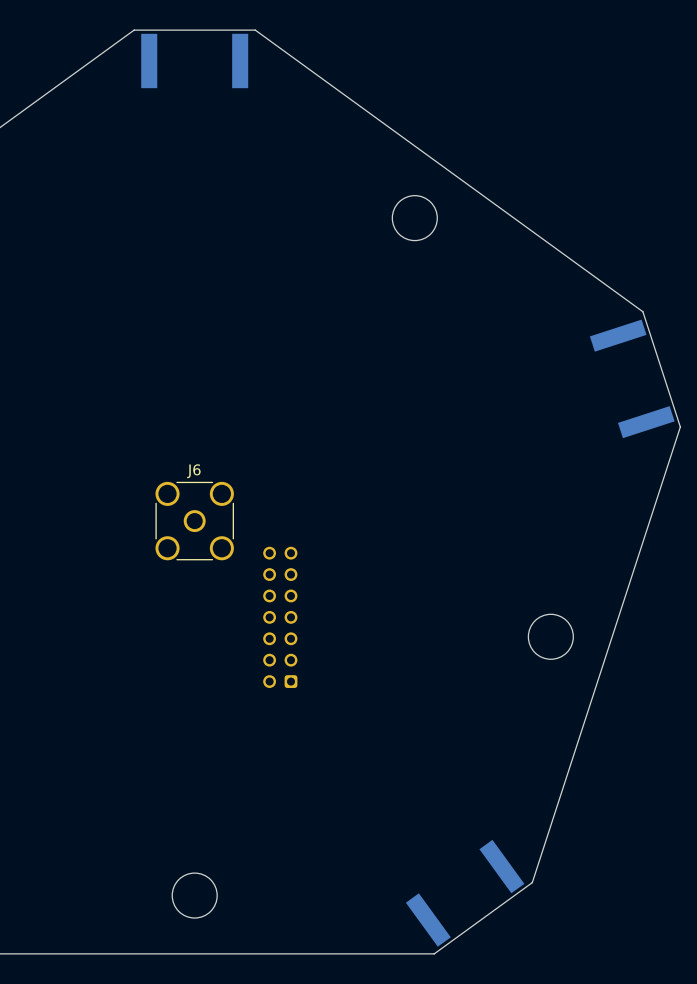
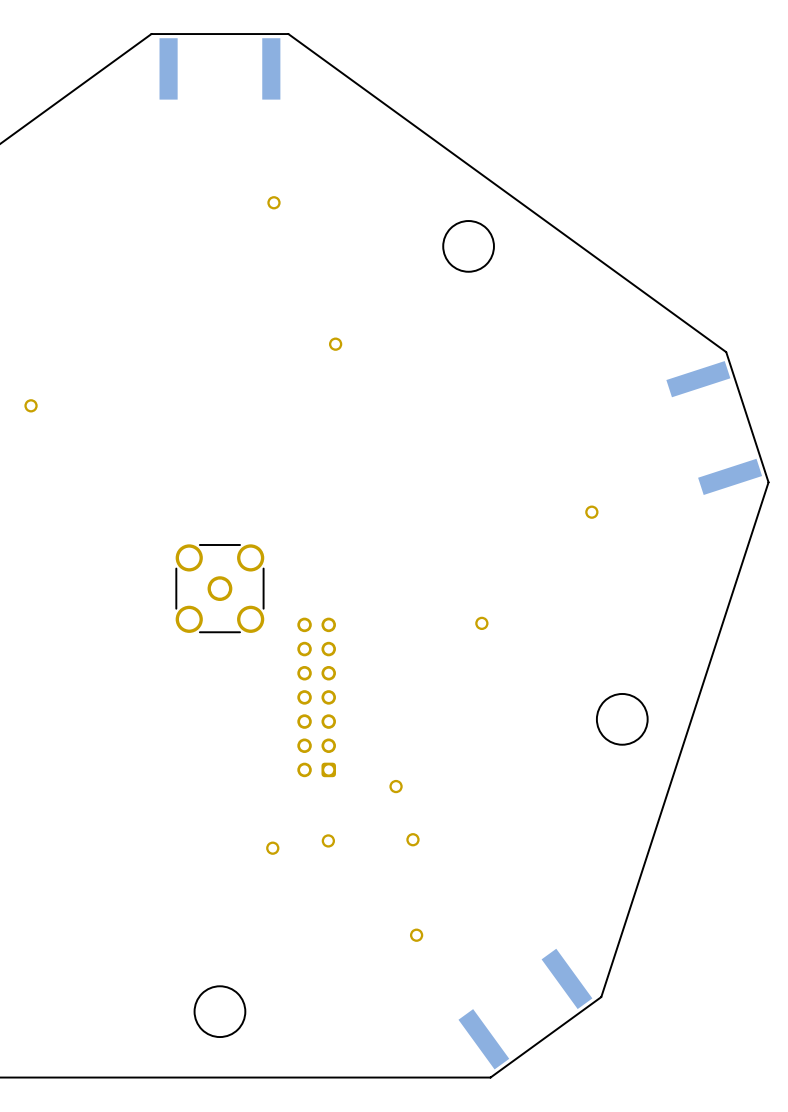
part: none -> (273, 202)
part: none -> (335, 344)
part: none -> (31, 405)
part: none -> (591, 512)
J6 name: J6 (193, 471) -> none
part: none -> (481, 623)
part: none -> (396, 786)
part: none -> (412, 839)
part: none -> (328, 840)
part: none -> (272, 848)
part: none -> (416, 935)

